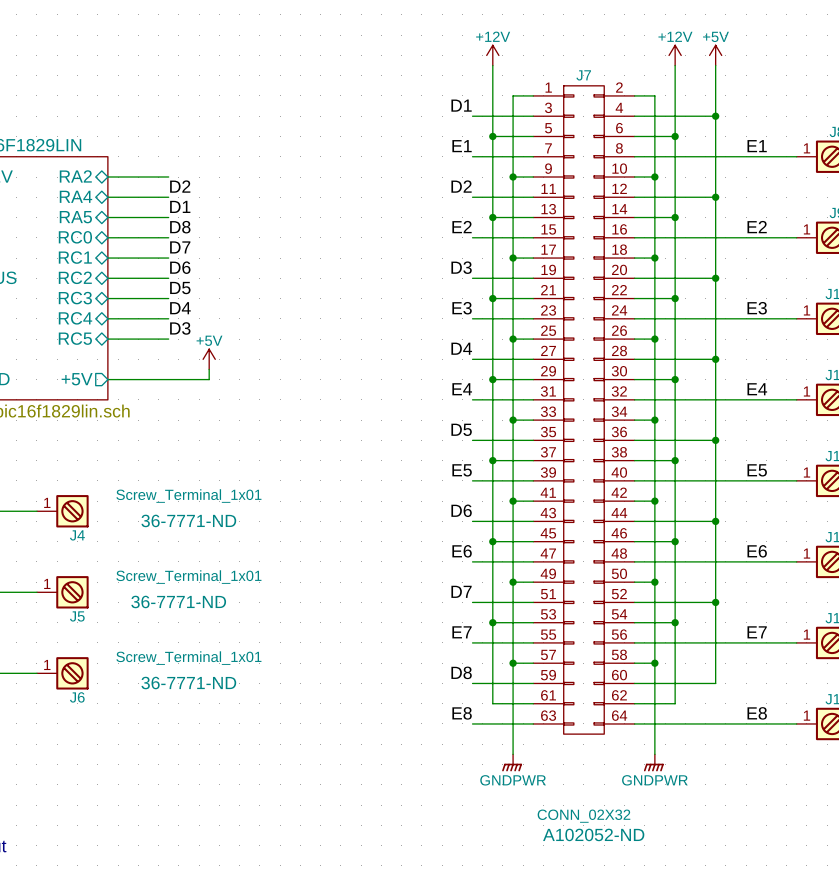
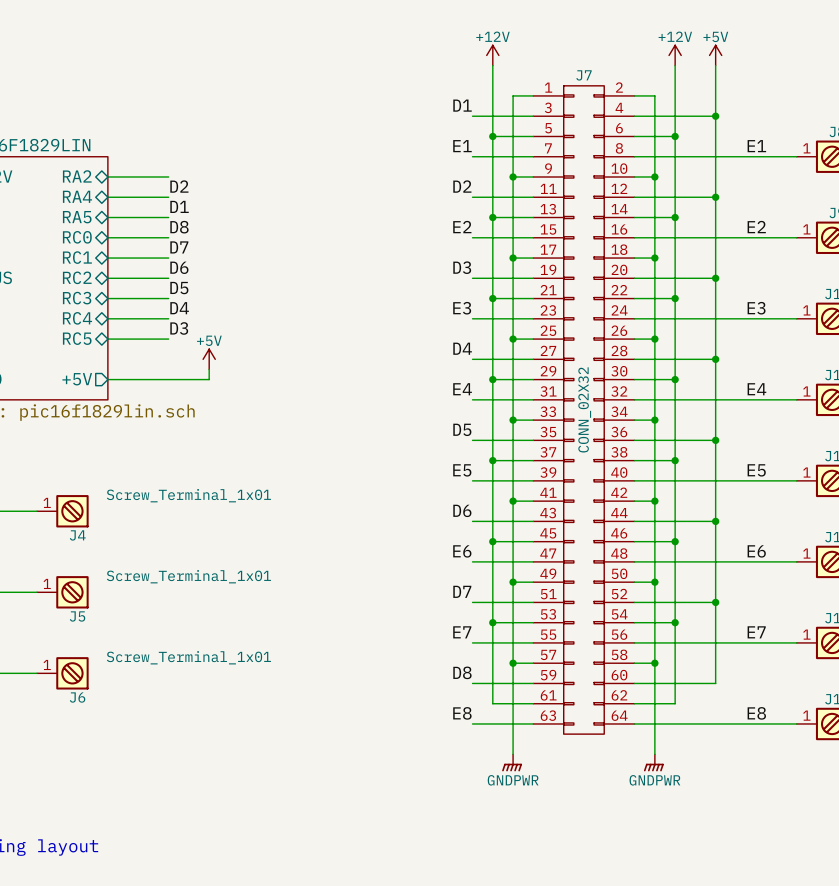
J4 text: 36-7771-ND (188, 520) -> none
J5 text: 36-7771-ND (178, 601) -> none
J6 text: 36-7771-ND (188, 683) -> none
J7 value rotation: 0° (583, 816) -> 90° counterclockwise (584, 409)
J7 value position: CONN_02X32 (583, 816) -> CONN_02X32 (584, 409)
J7 text: A102052-ND (593, 834) -> none

